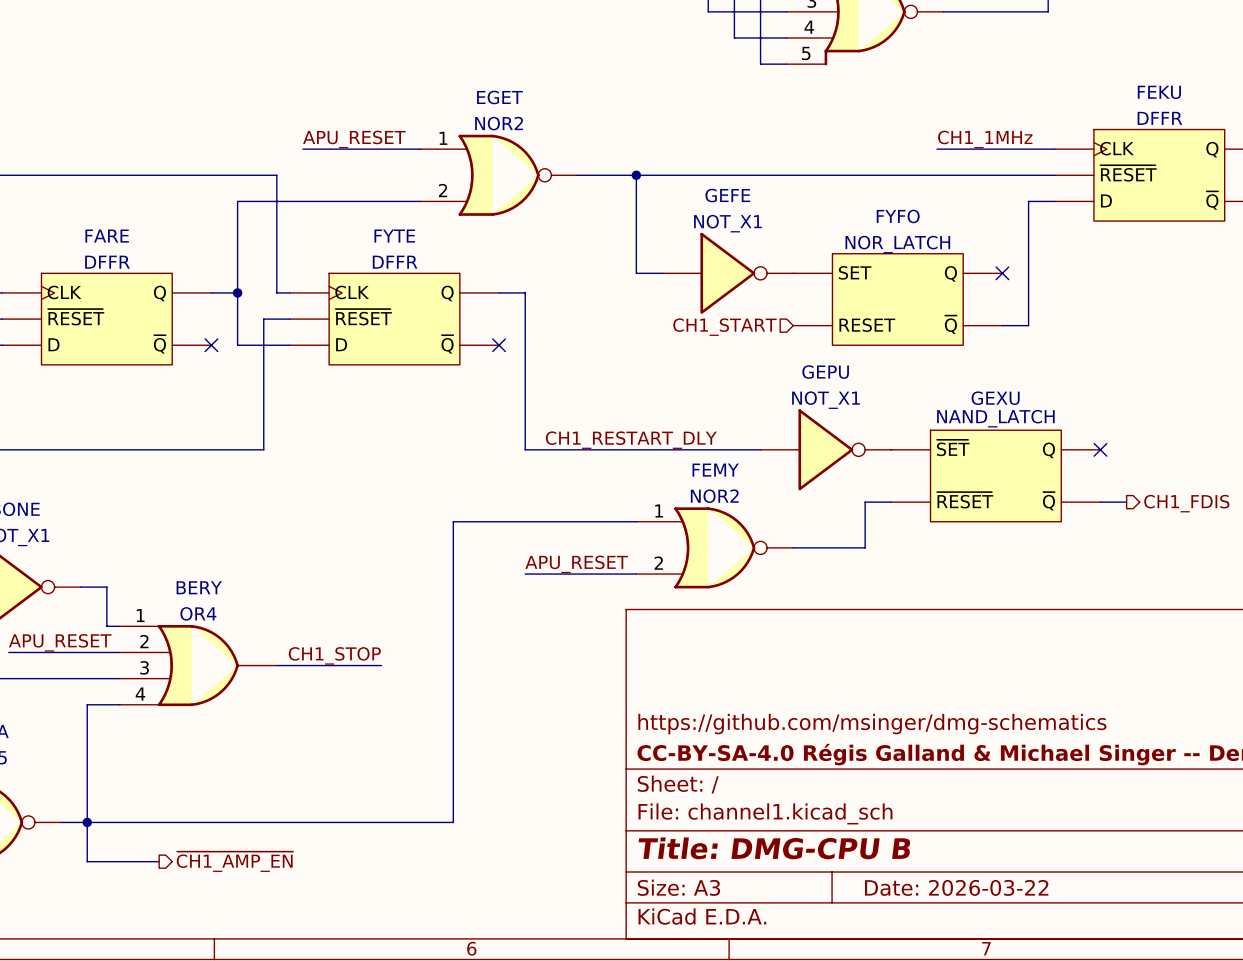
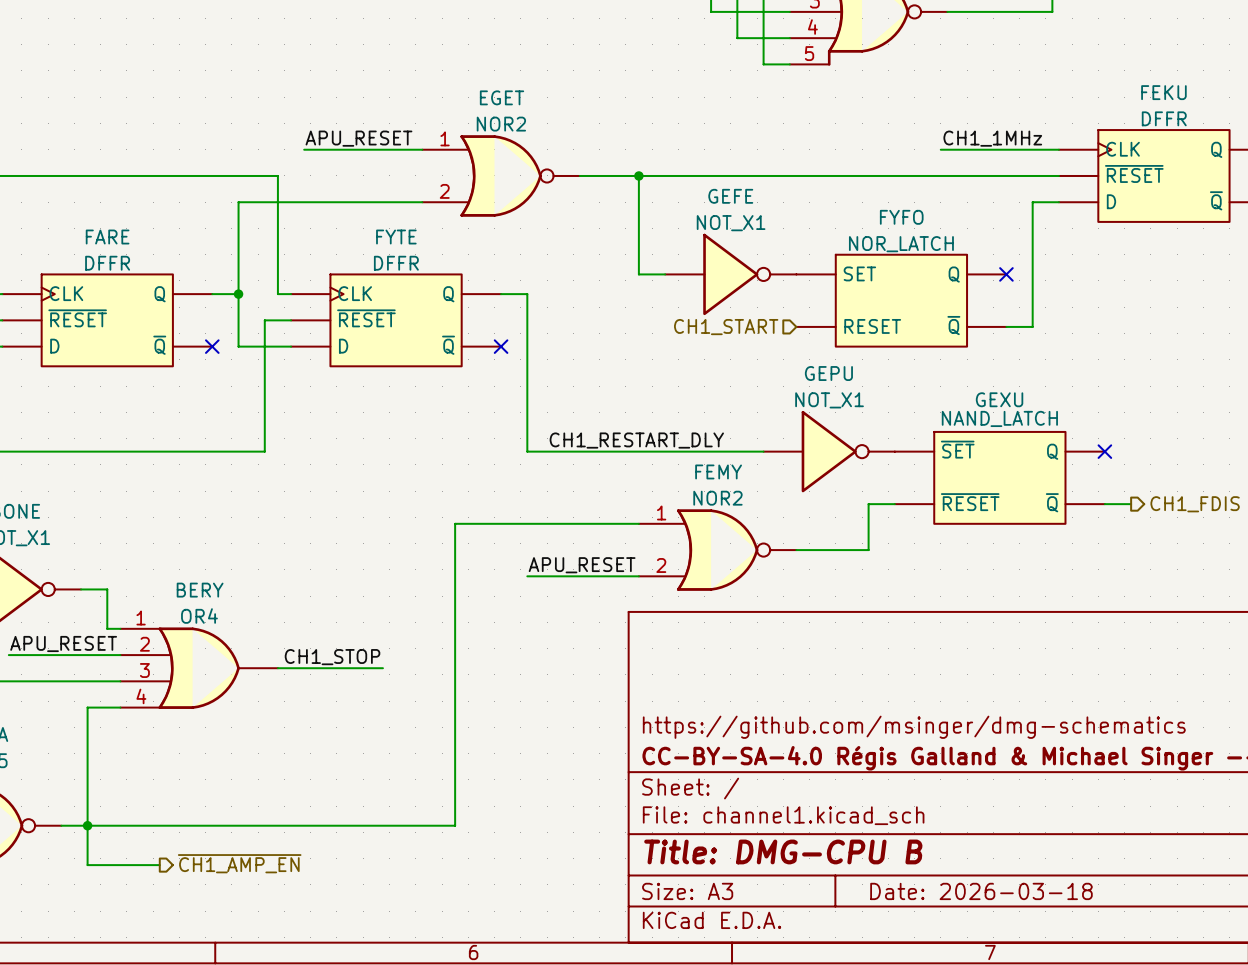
title block: Date: 2026-03-22 (956, 887) -> Date: 2026-03-18 (981, 891)

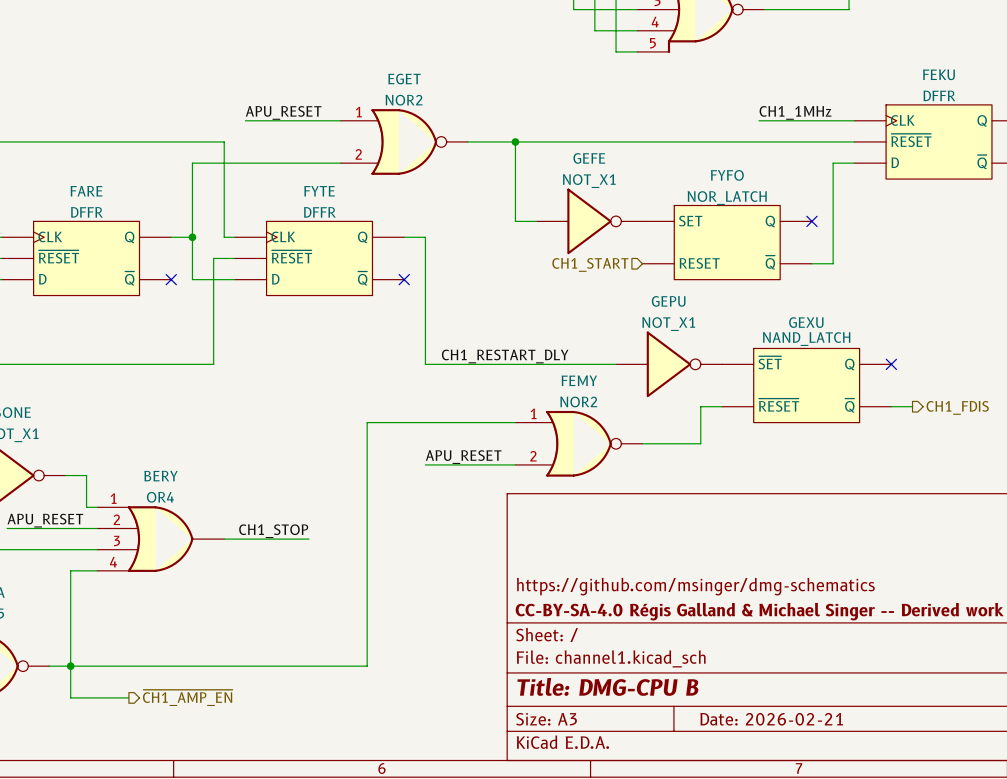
title block: Date: 2026-03-18 (981, 891) -> Date: 2026-02-21 (771, 719)

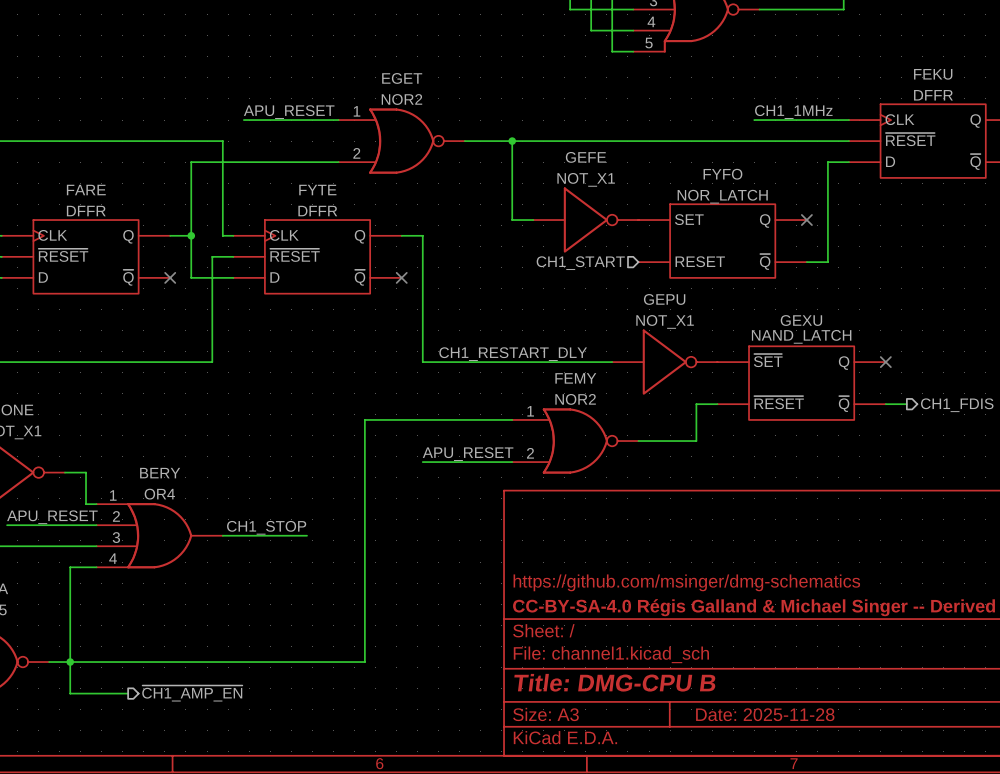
title block: Date: 2026-02-21 (771, 719) -> Date: 2025-11-28 (765, 714)

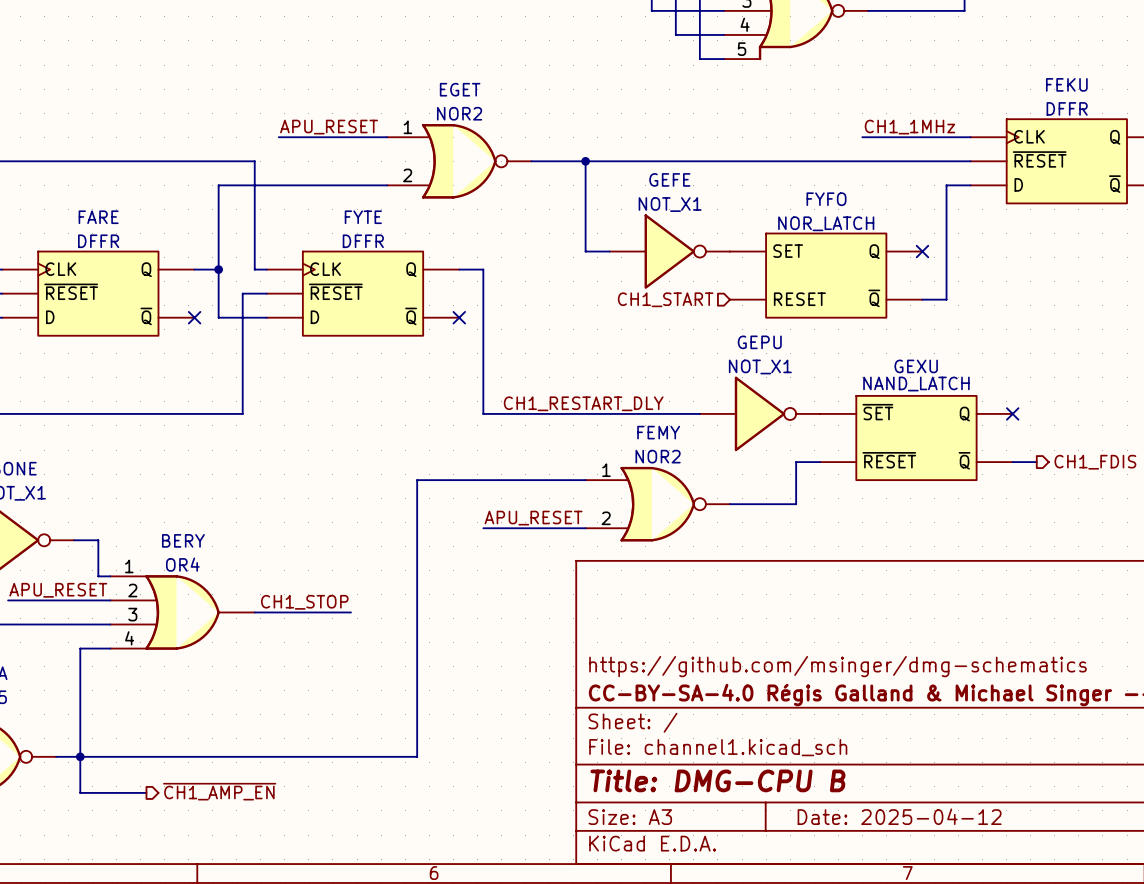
title block: Date: 2025-11-28 (765, 714) -> Date: 2025-04-12 (899, 816)

